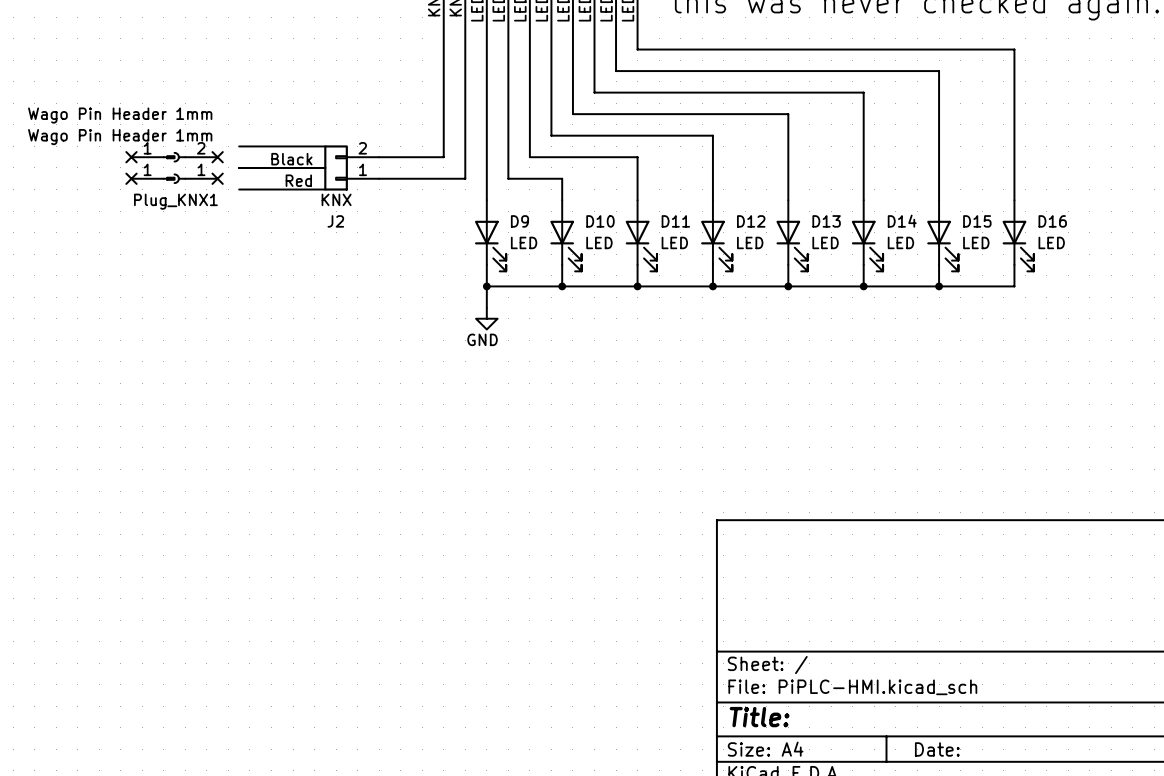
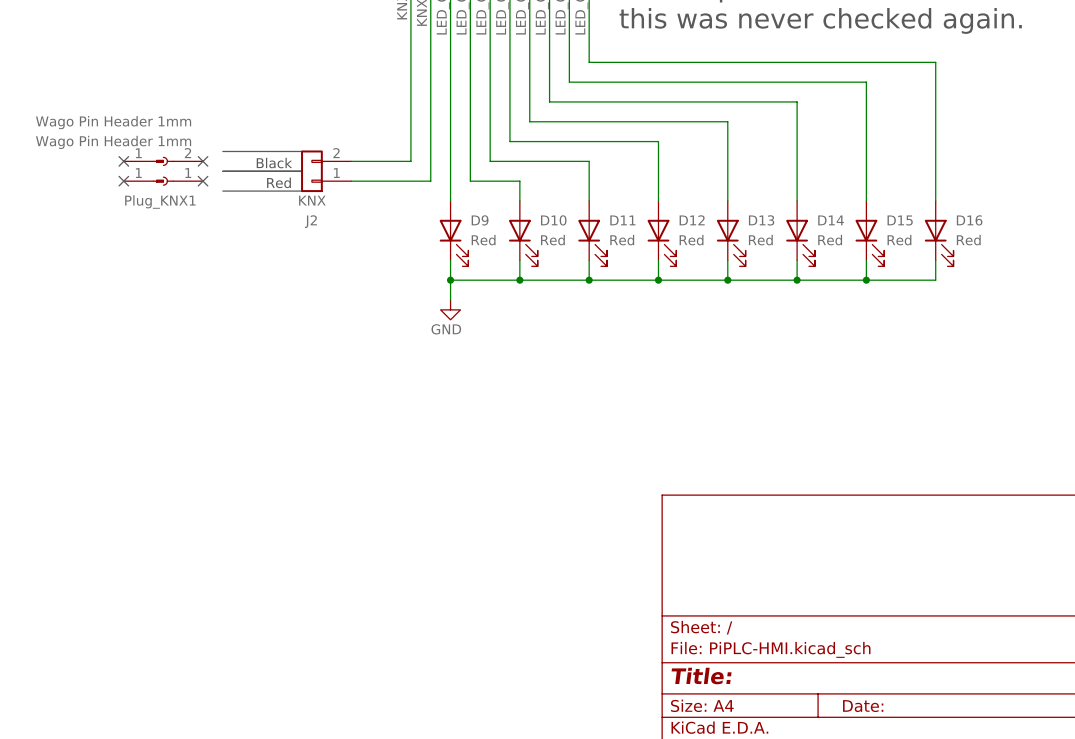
D9 value: LED (524, 242) -> Red (483, 240)
D10 value: LED (599, 242) -> Red (552, 240)
D11 value: LED (674, 242) -> Red (622, 240)
D12 value: LED (750, 242) -> Red (691, 240)
D13 value: LED (825, 242) -> Red (760, 240)
D14 value: LED (900, 242) -> Red (830, 240)
D15 value: LED (976, 242) -> Red (899, 240)
D16 value: LED (1051, 242) -> Red (968, 240)

